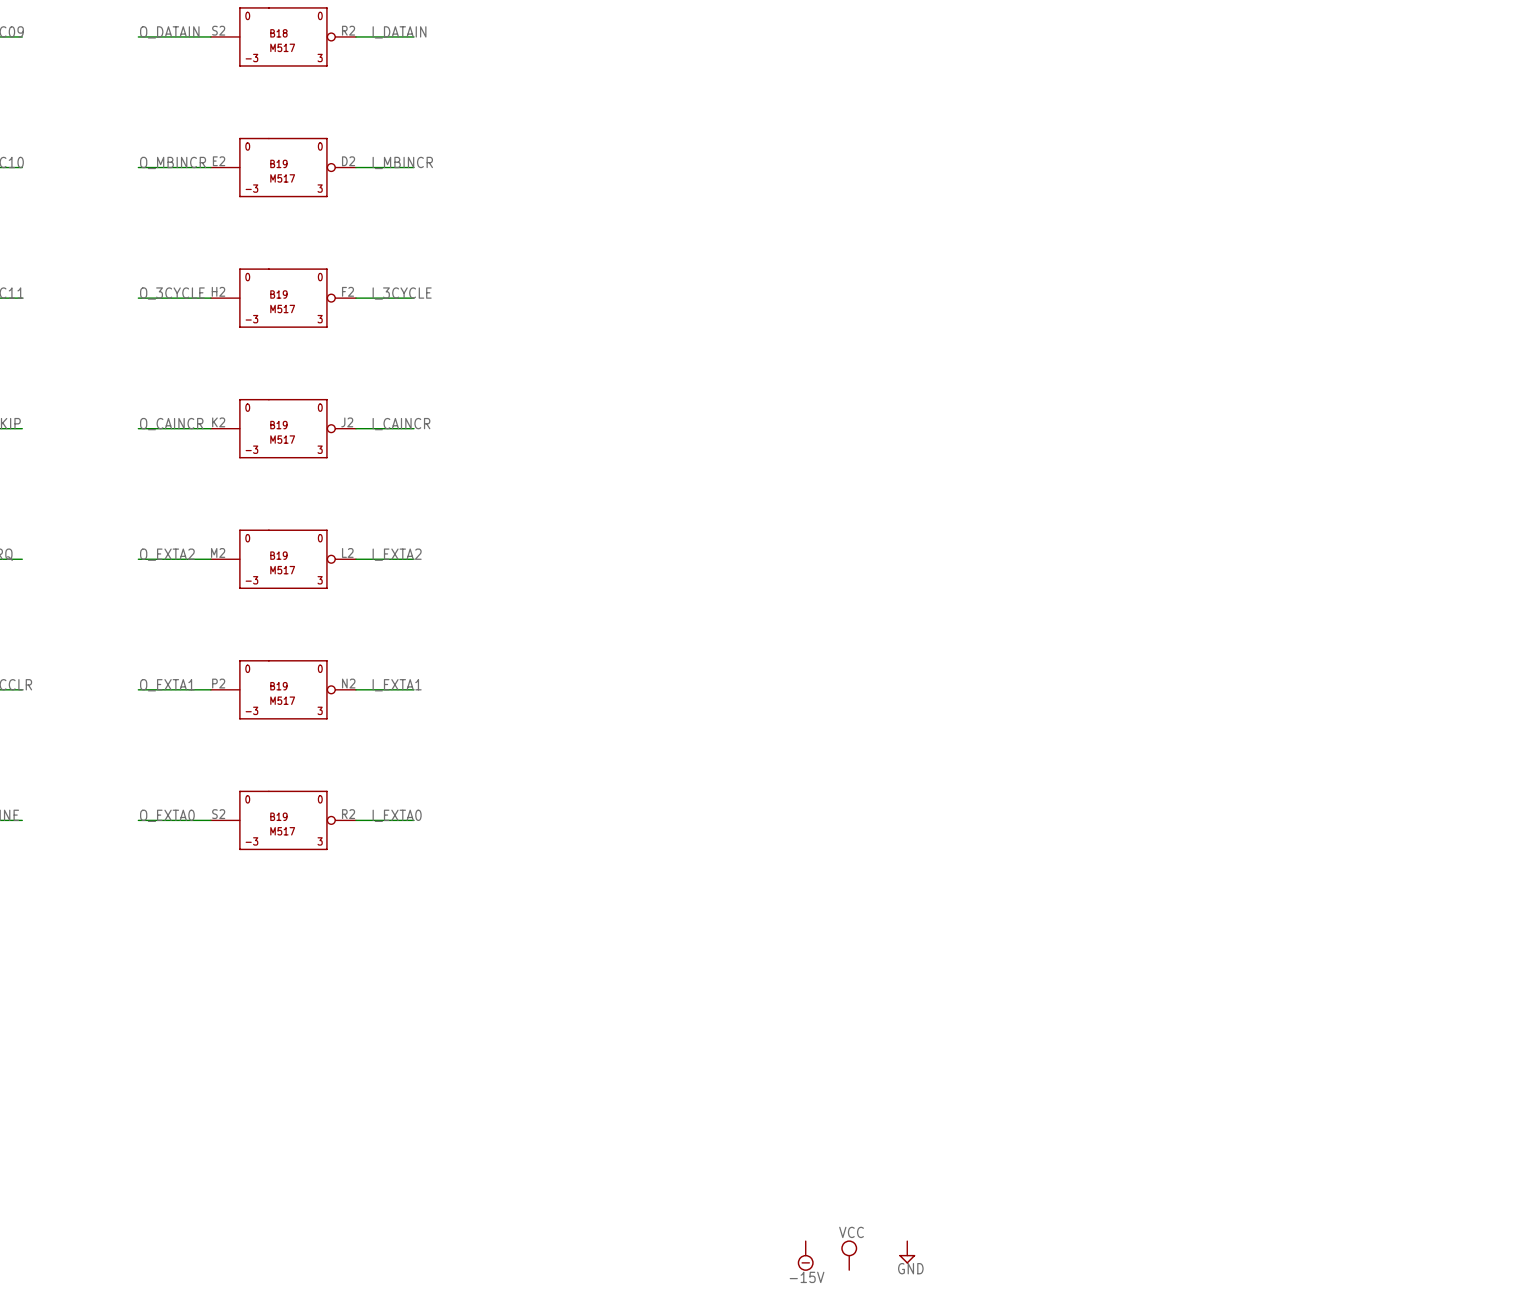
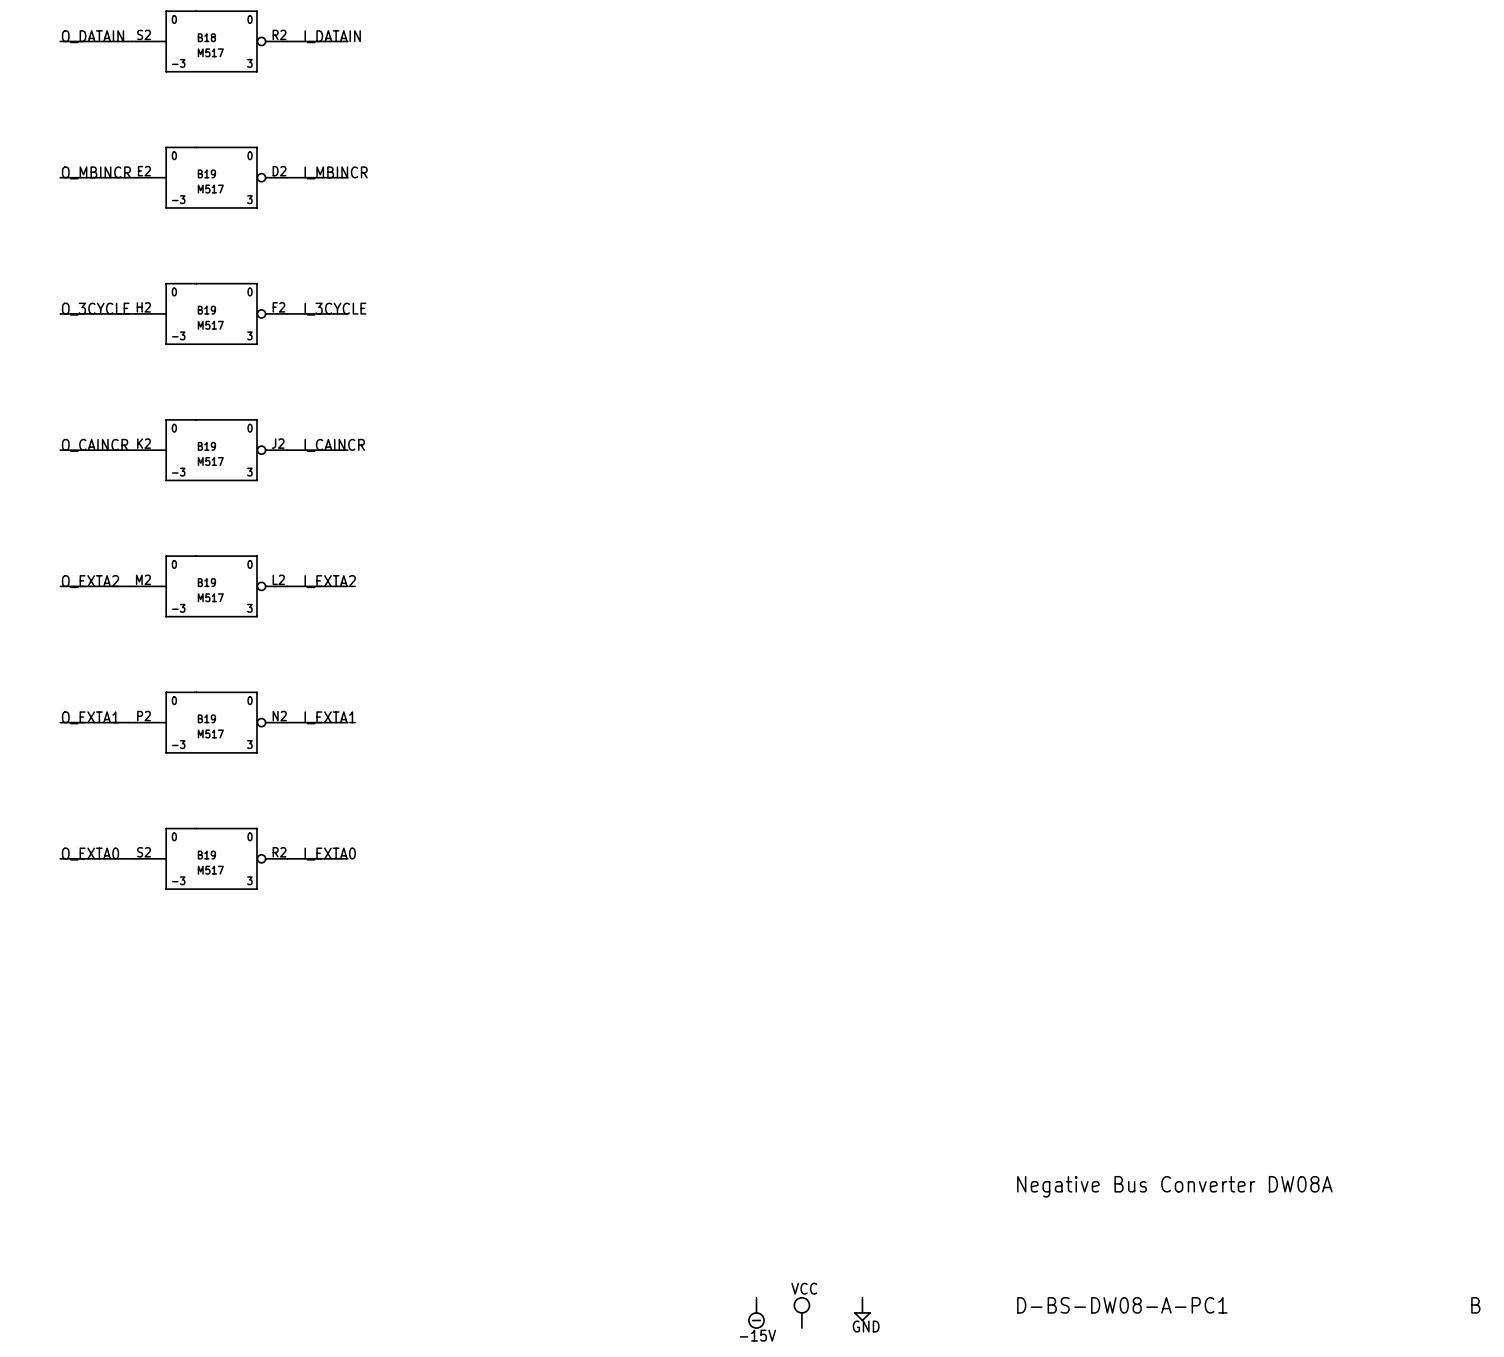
text: none -> Negative Bus Converter DW08A (1174, 1186)
text: none -> D-BS-DW08-A-PC1 (1122, 1305)
text: none -> B (1475, 1305)

